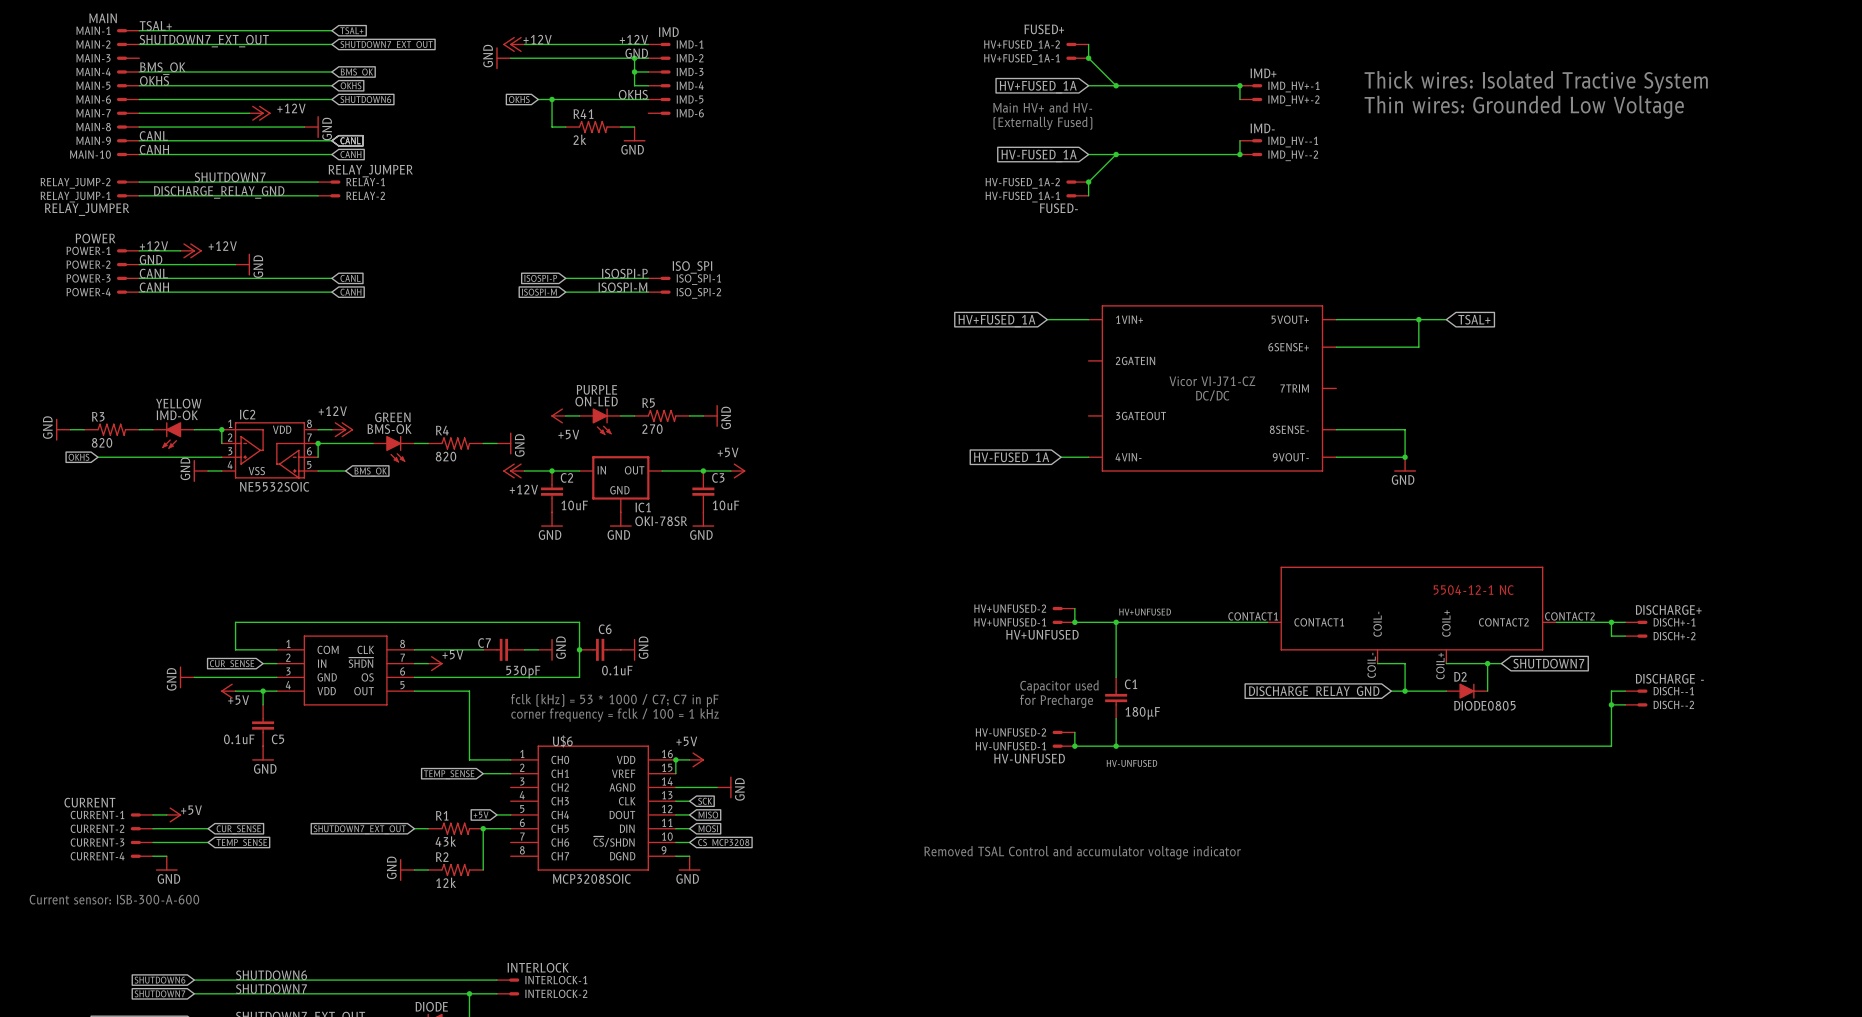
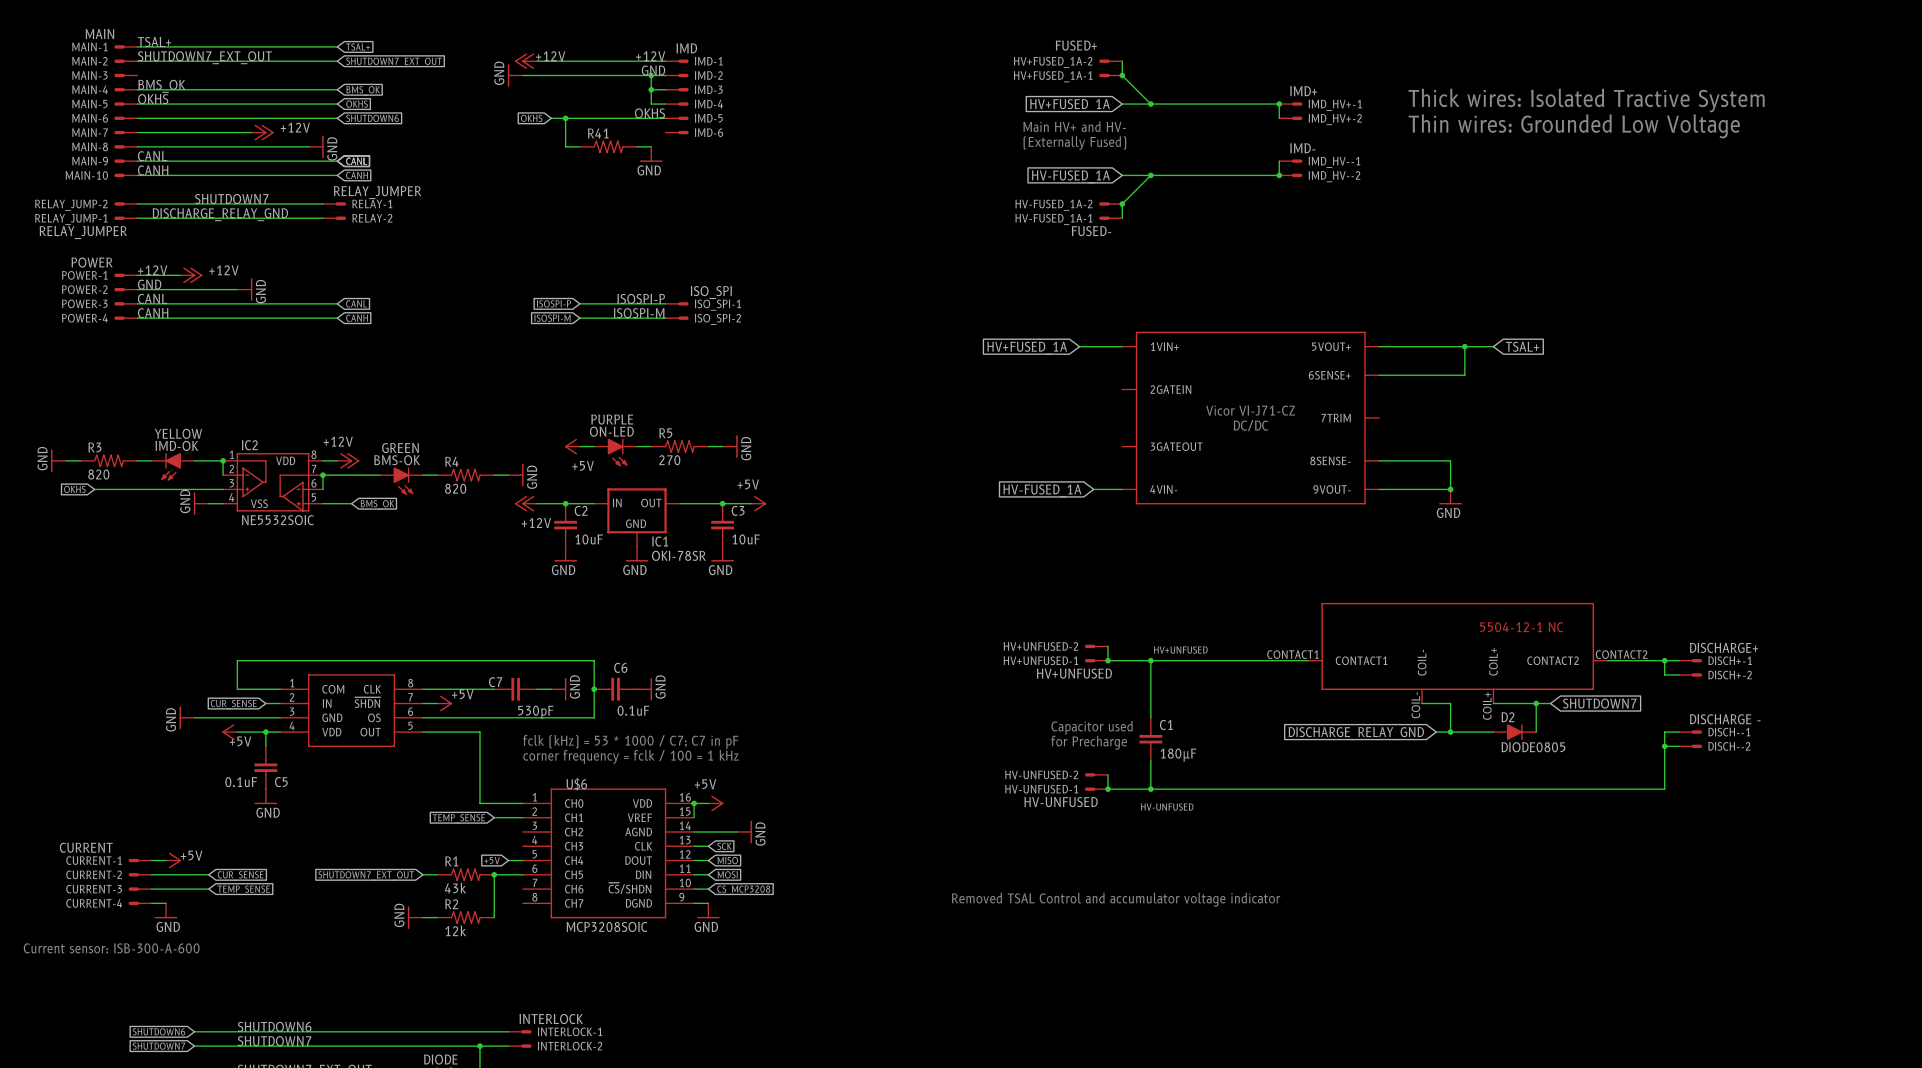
R41 value: 2k (579, 139) -> none

